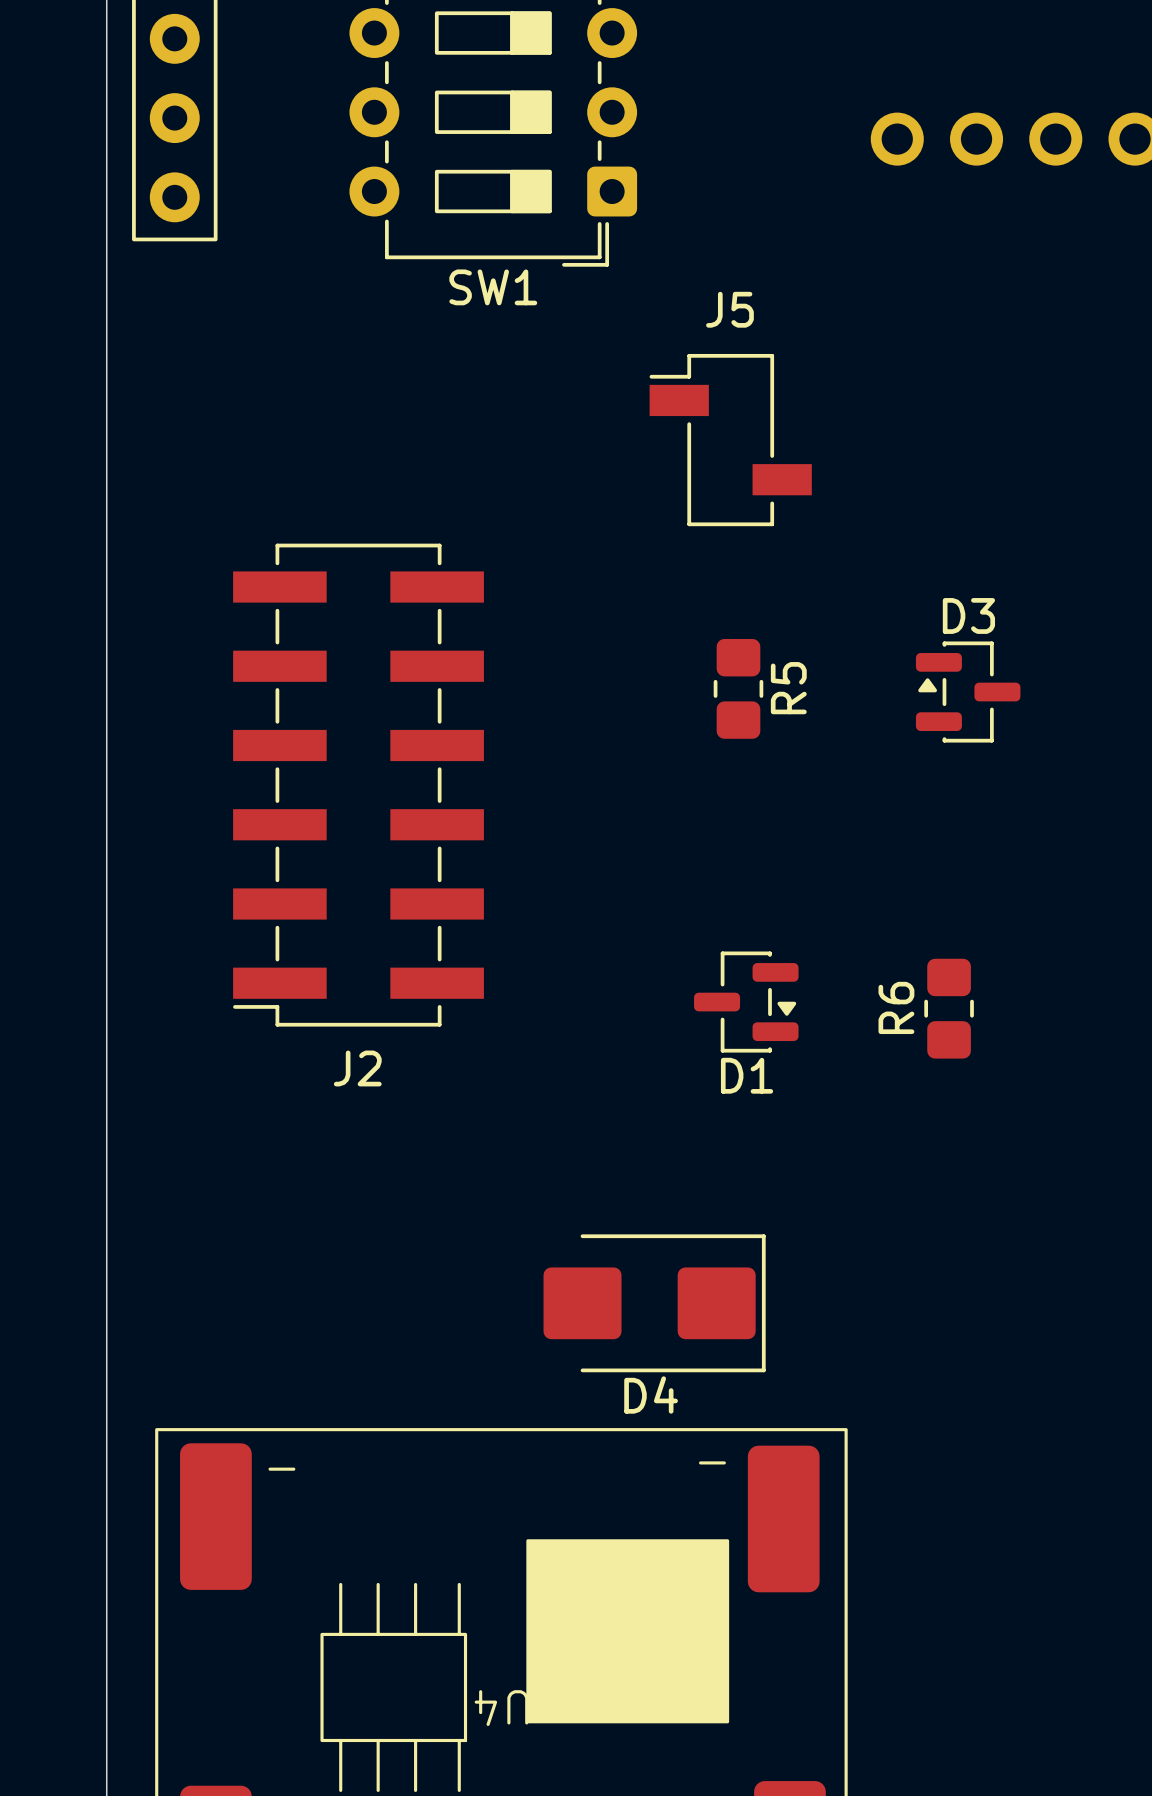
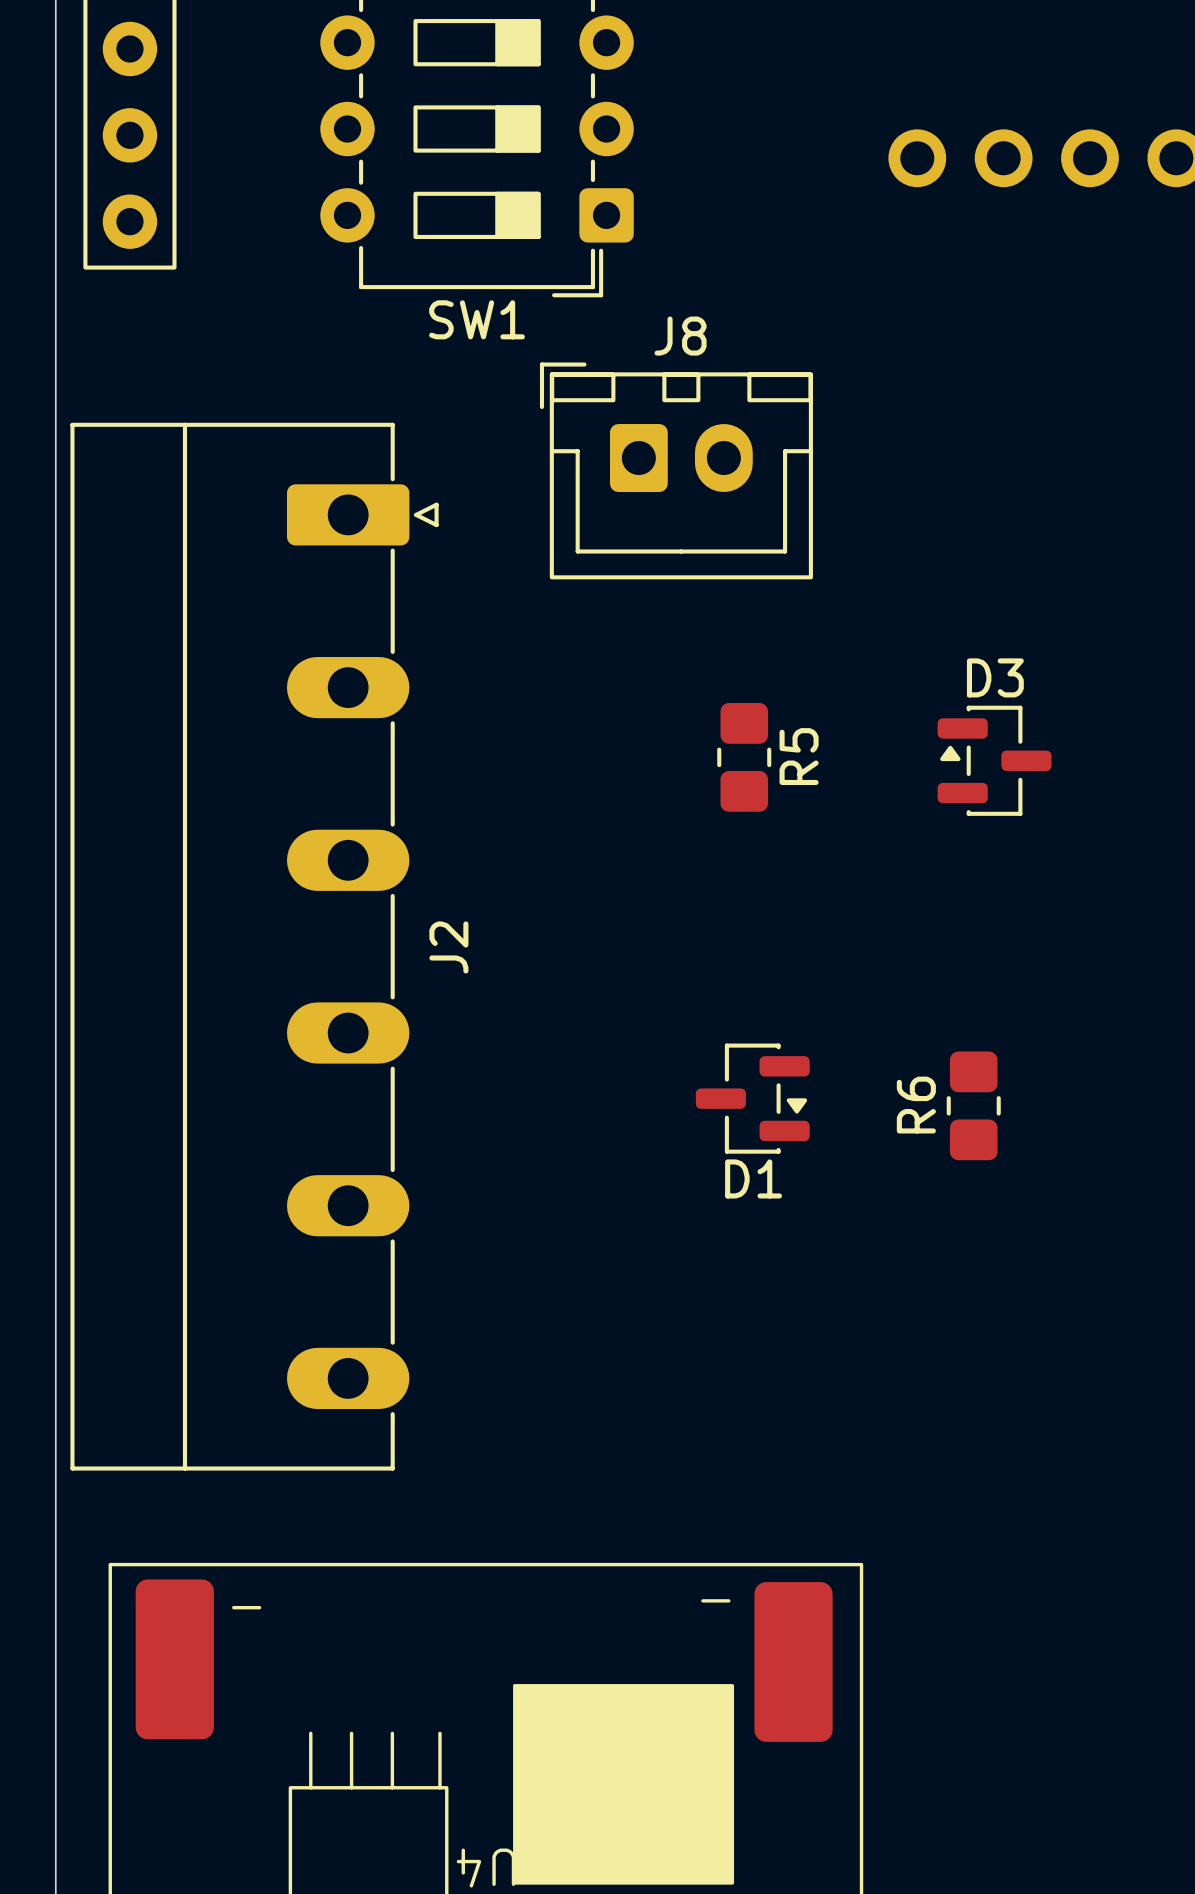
J8: none -> (676, 470)
J5: (730, 440) -> none
J2 footprint: [233, 543, 484, 1027] -> [70, 422, 439, 1471]
J2 name position: J2 (357, 1068) -> J2 (448, 947)
D4: (654, 1303) -> none

